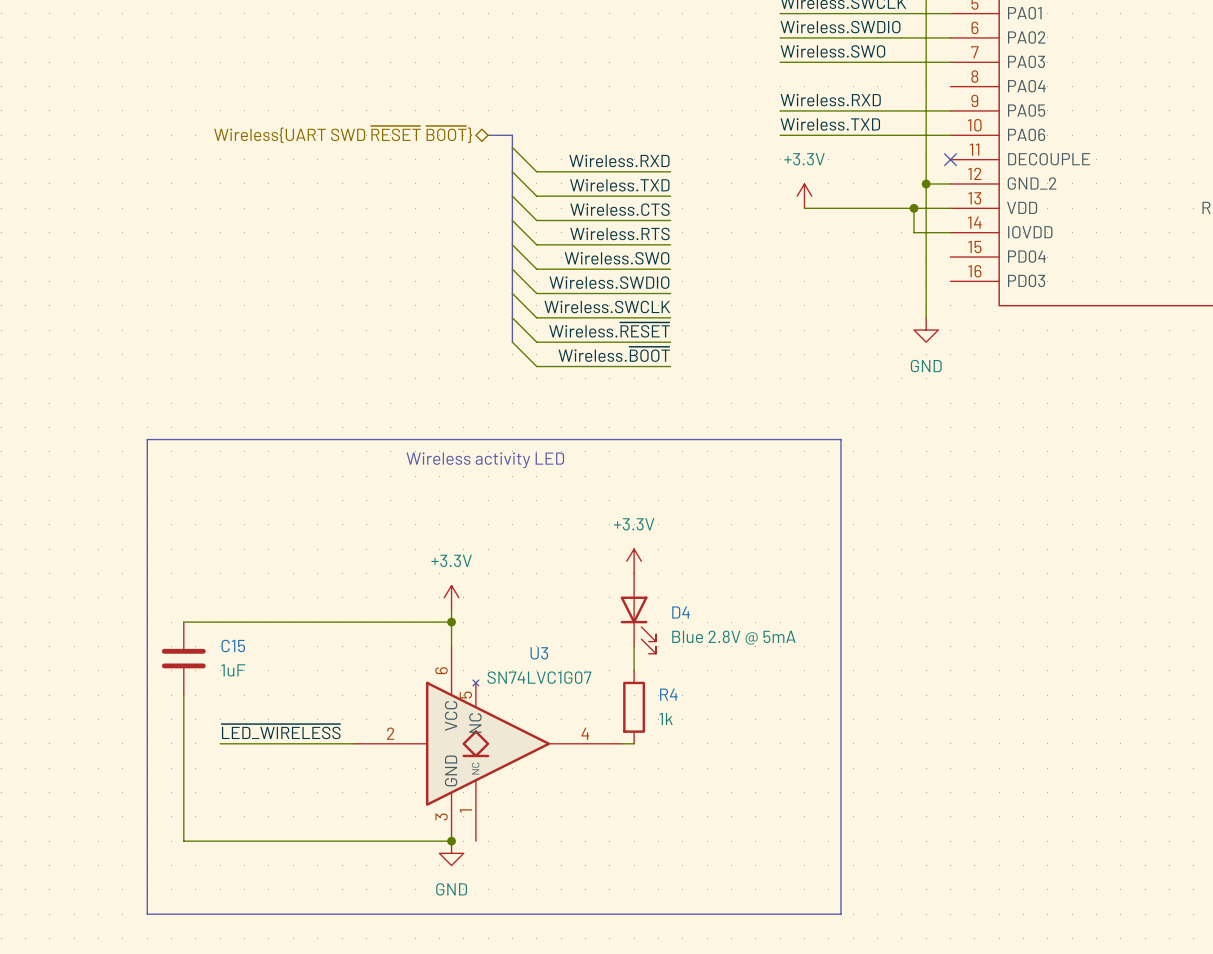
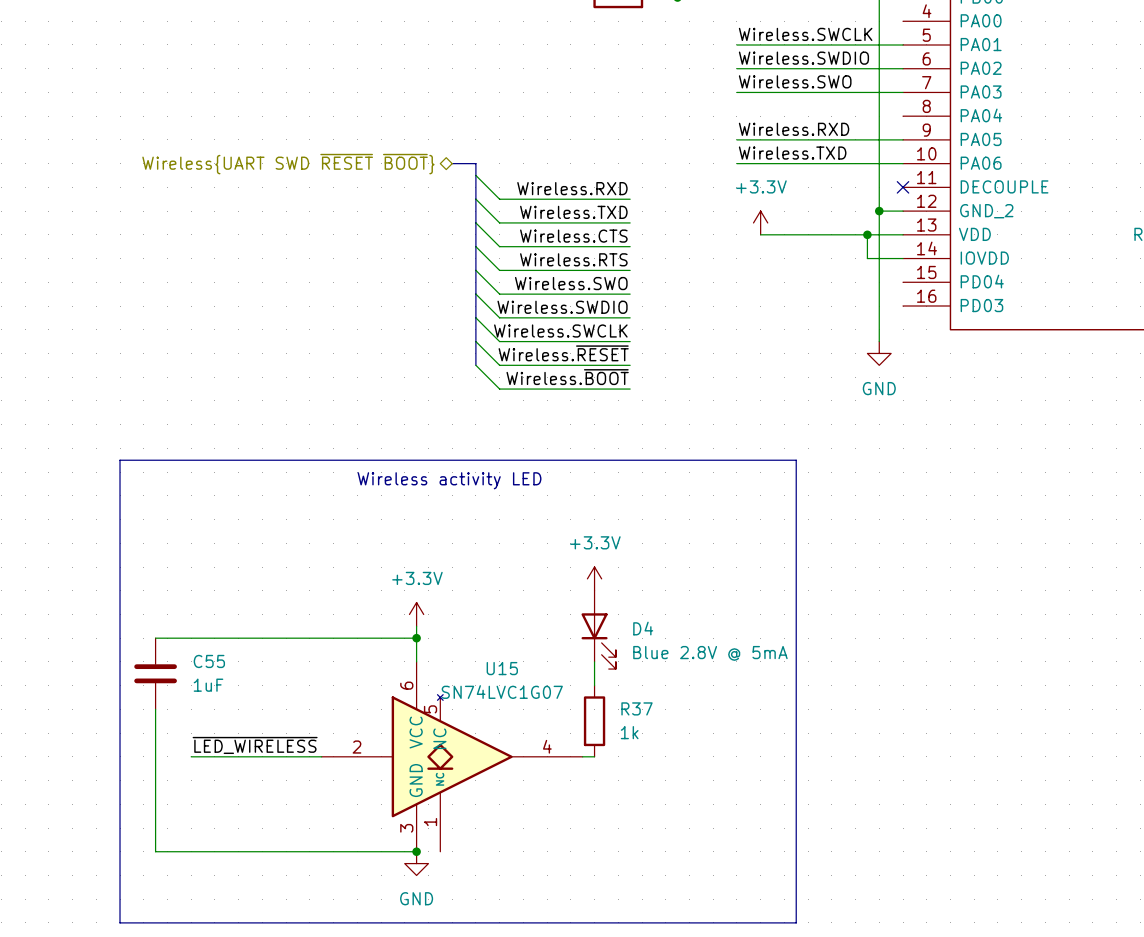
C15 name: C15 (233, 645) -> C55 (209, 661)
U3 name: U3 (539, 653) -> U15 (502, 668)
R4 name: R4 (668, 694) -> R37 (637, 708)

